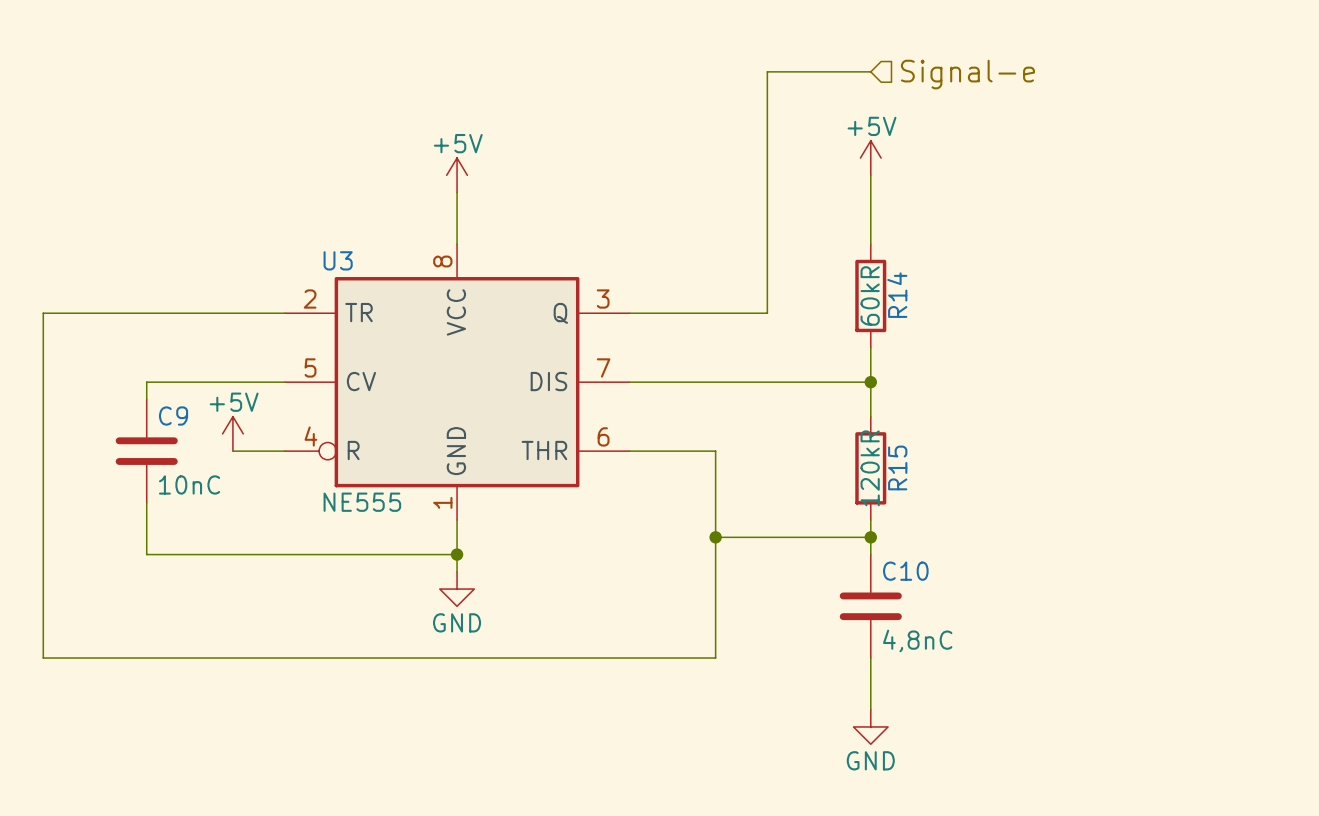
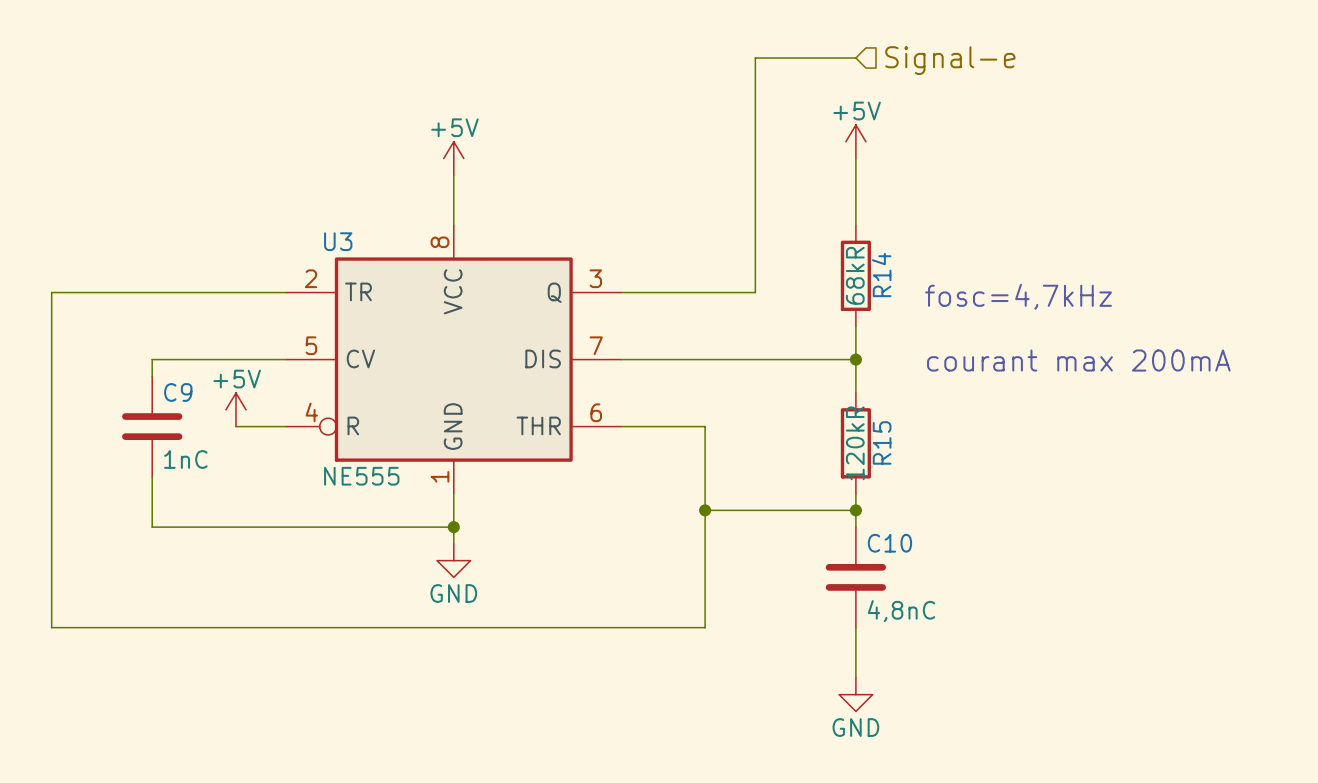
R14 value: 60kR (870, 295) -> 68kR (855, 275)
text: none -> fosc=4,7kHz (1018, 296)
text: none -> courant max 200mA (1078, 360)
C9 value: 10nC (189, 484) -> 1nC (185, 459)

